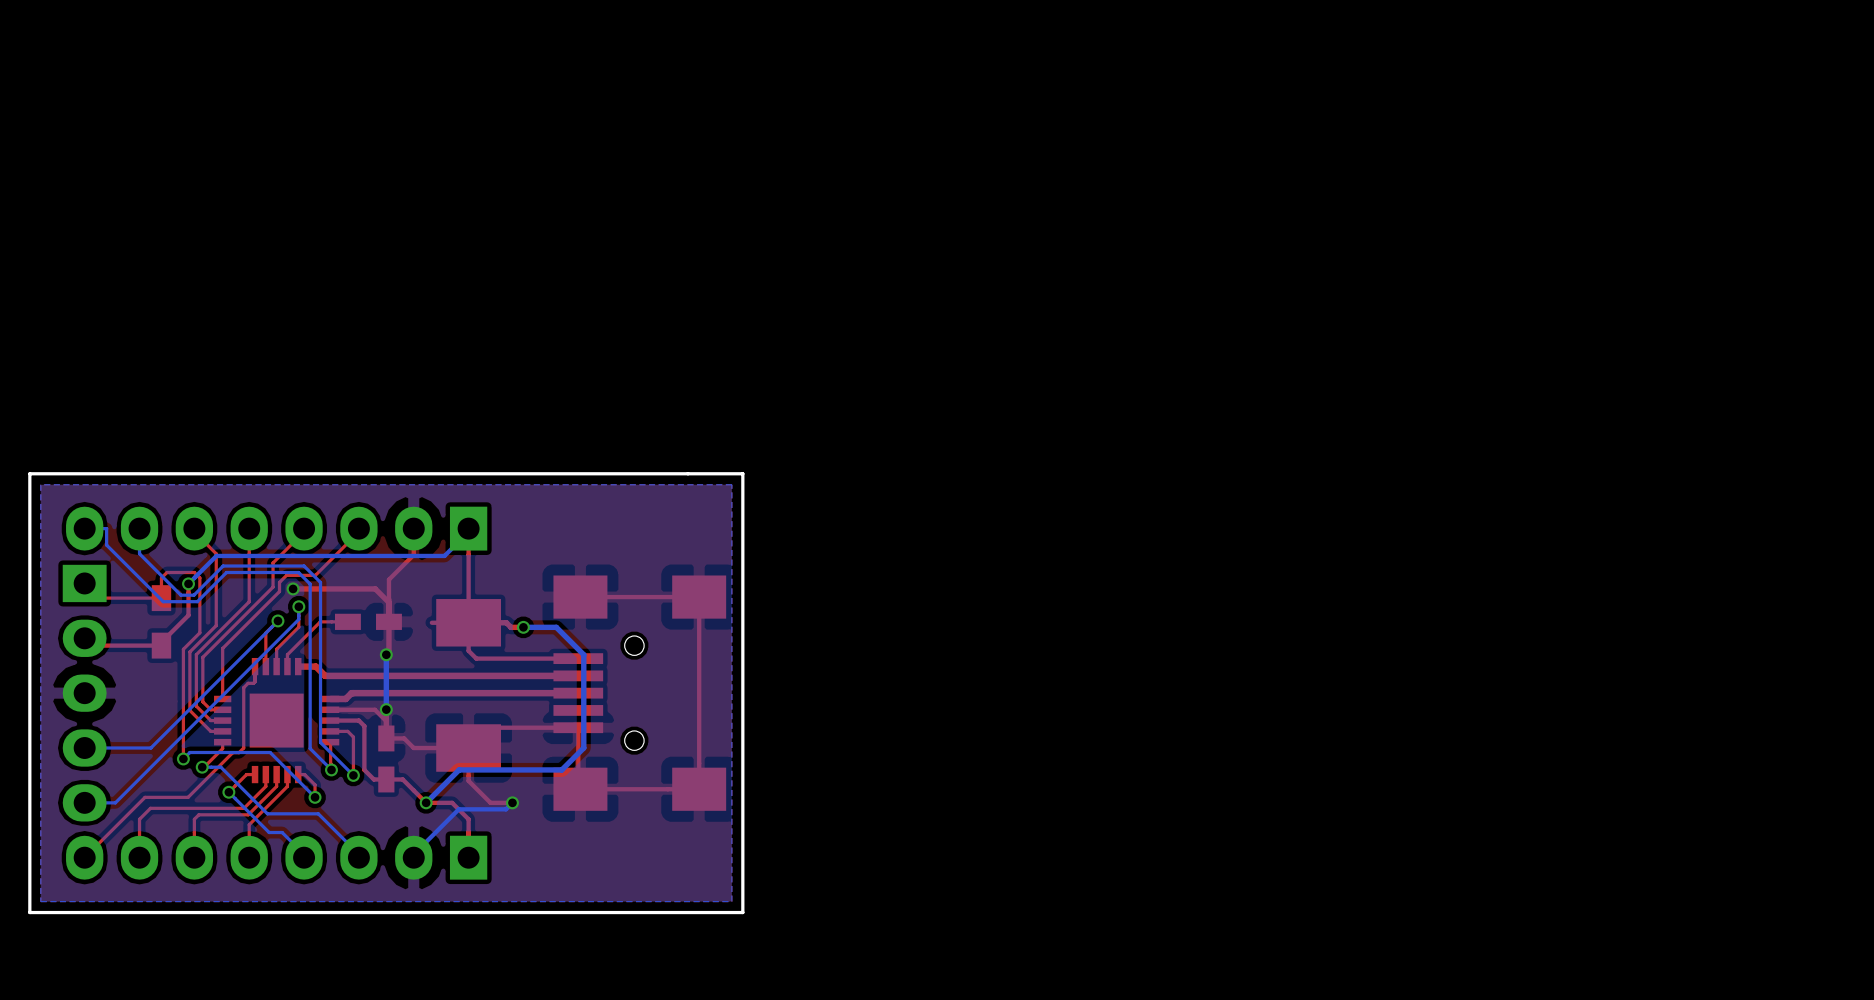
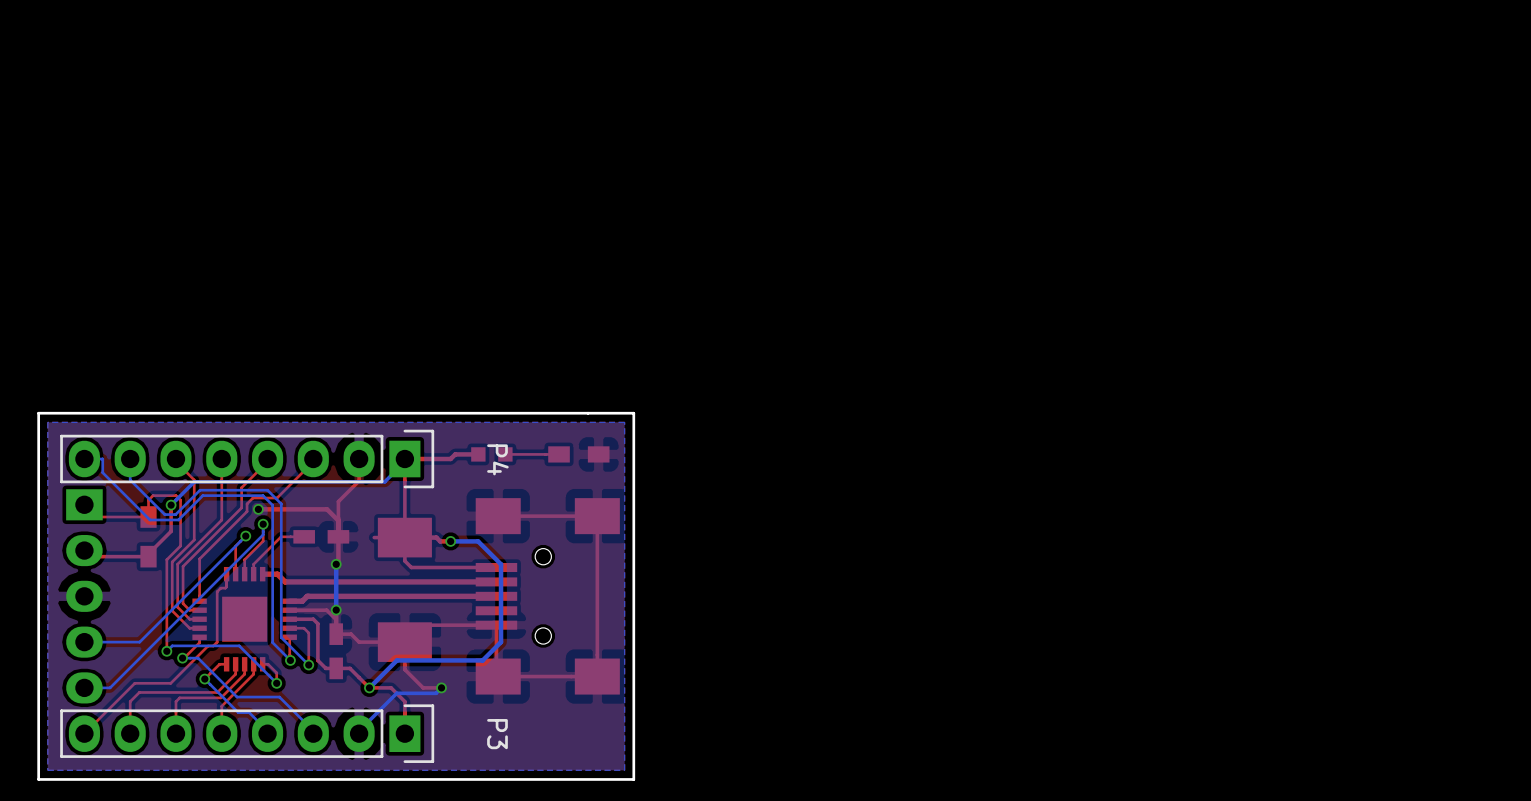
top track: none -> (478, 454) (455, 454) (450, 459) (404, 459)
part: none -> (491, 454)
top track: none -> (559, 454) (505, 454)
part: none -> (578, 454)
P4 side: top (276, 528) -> bottom (247, 459)
P3 side: top (276, 857) -> bottom (247, 733)

